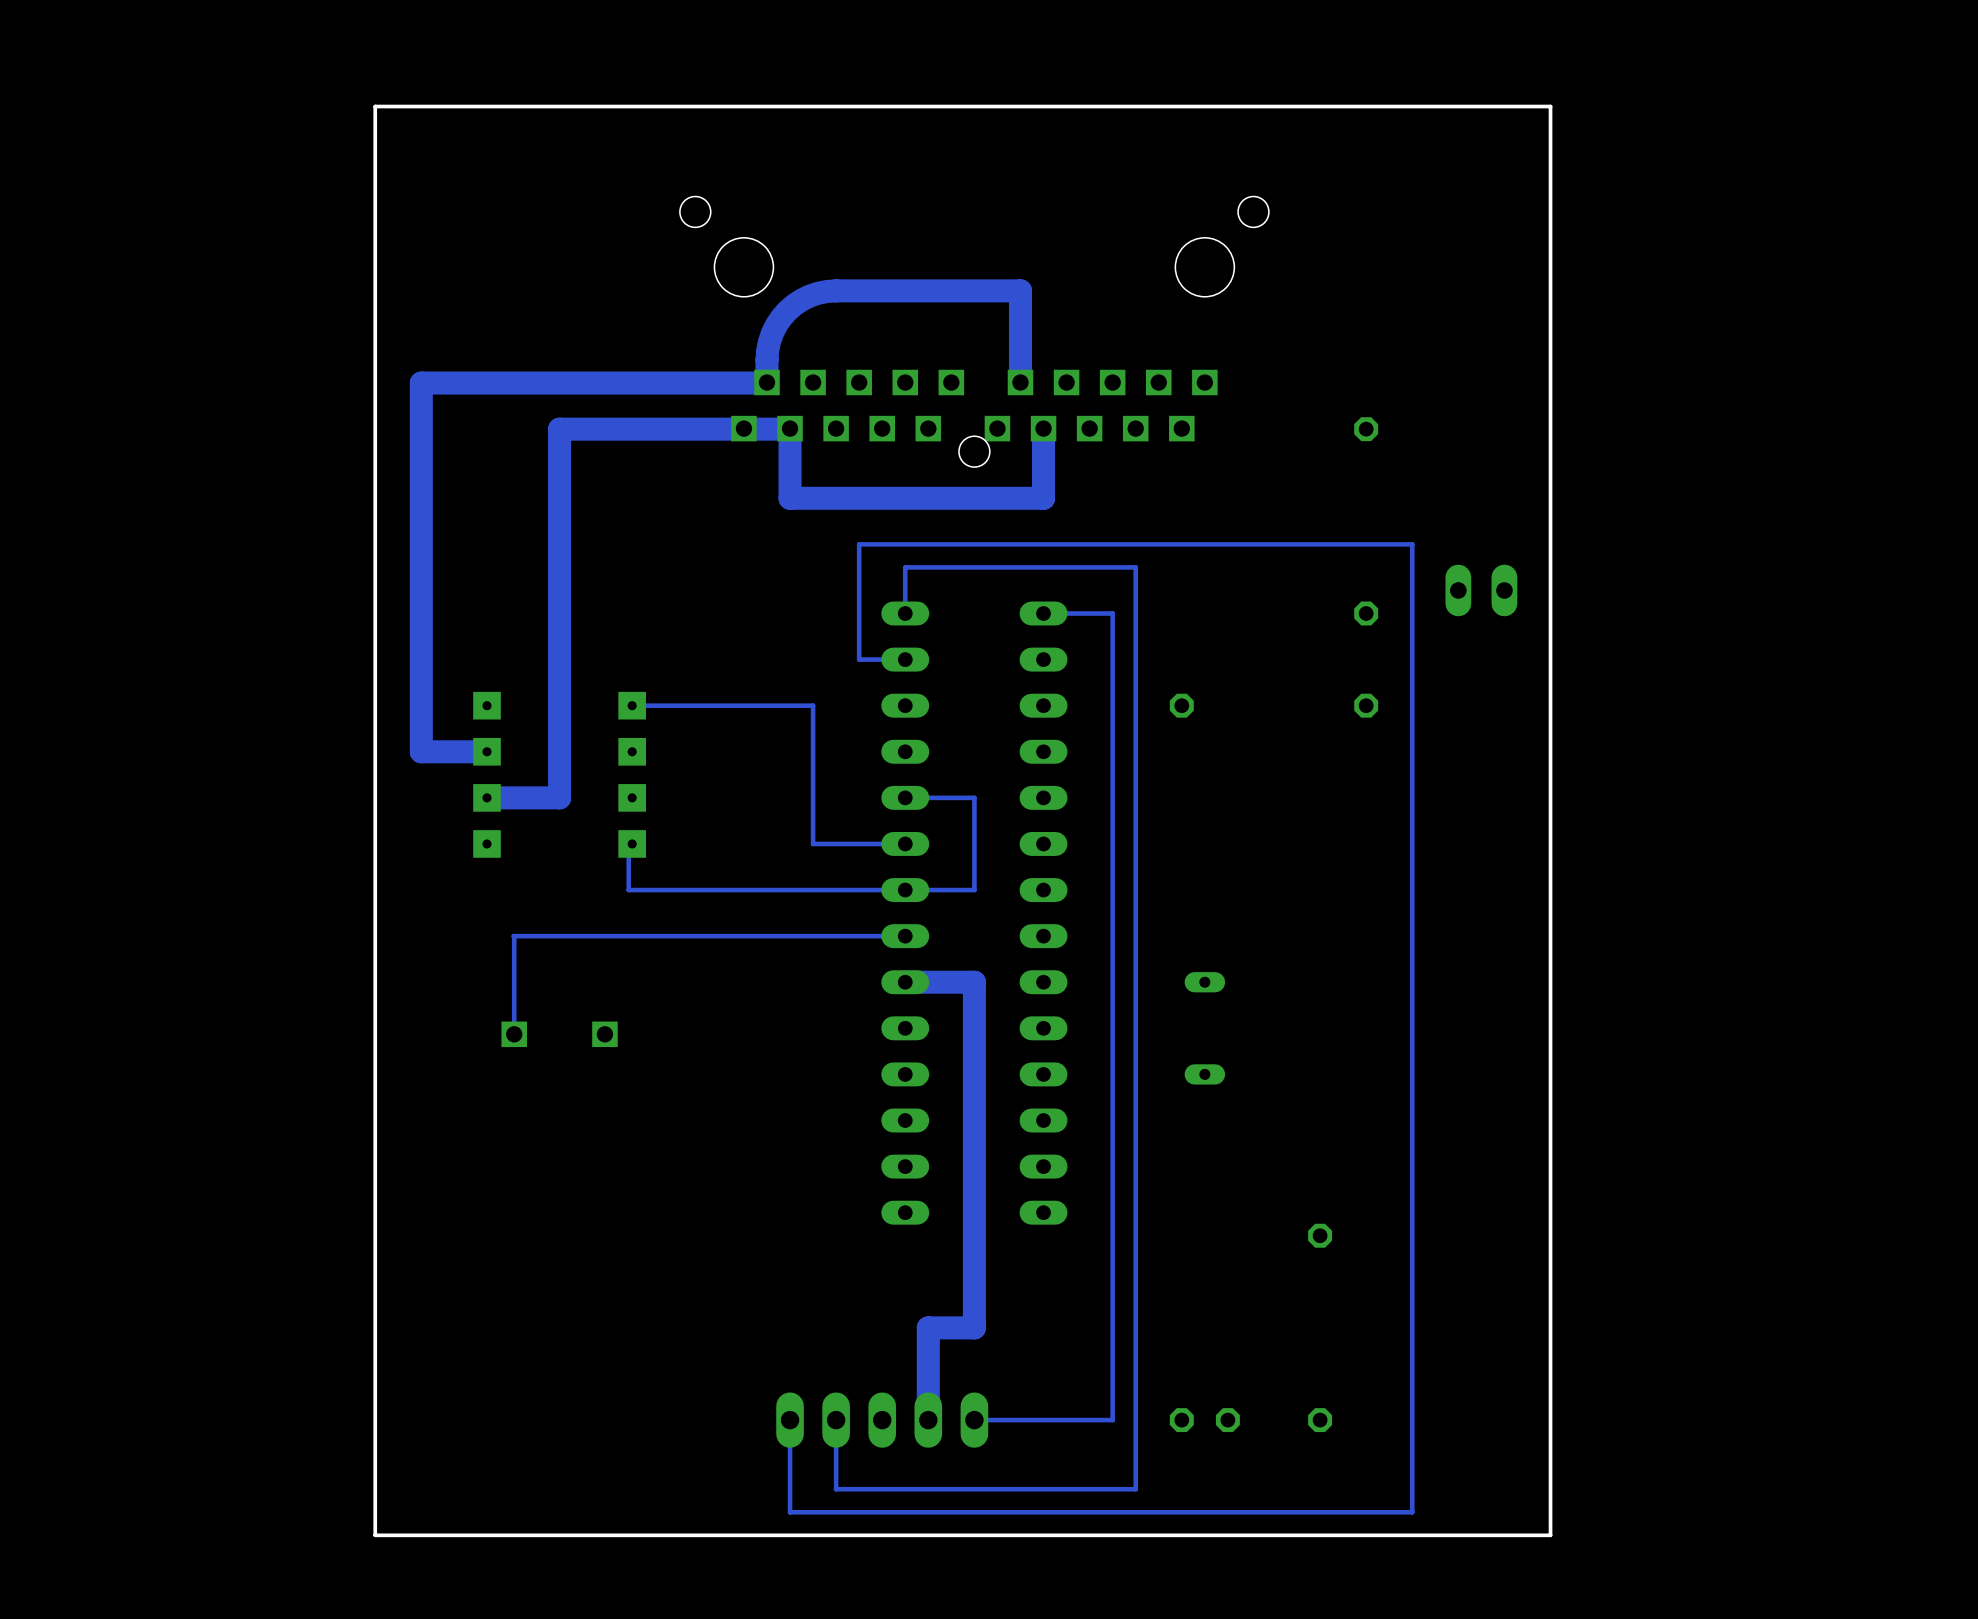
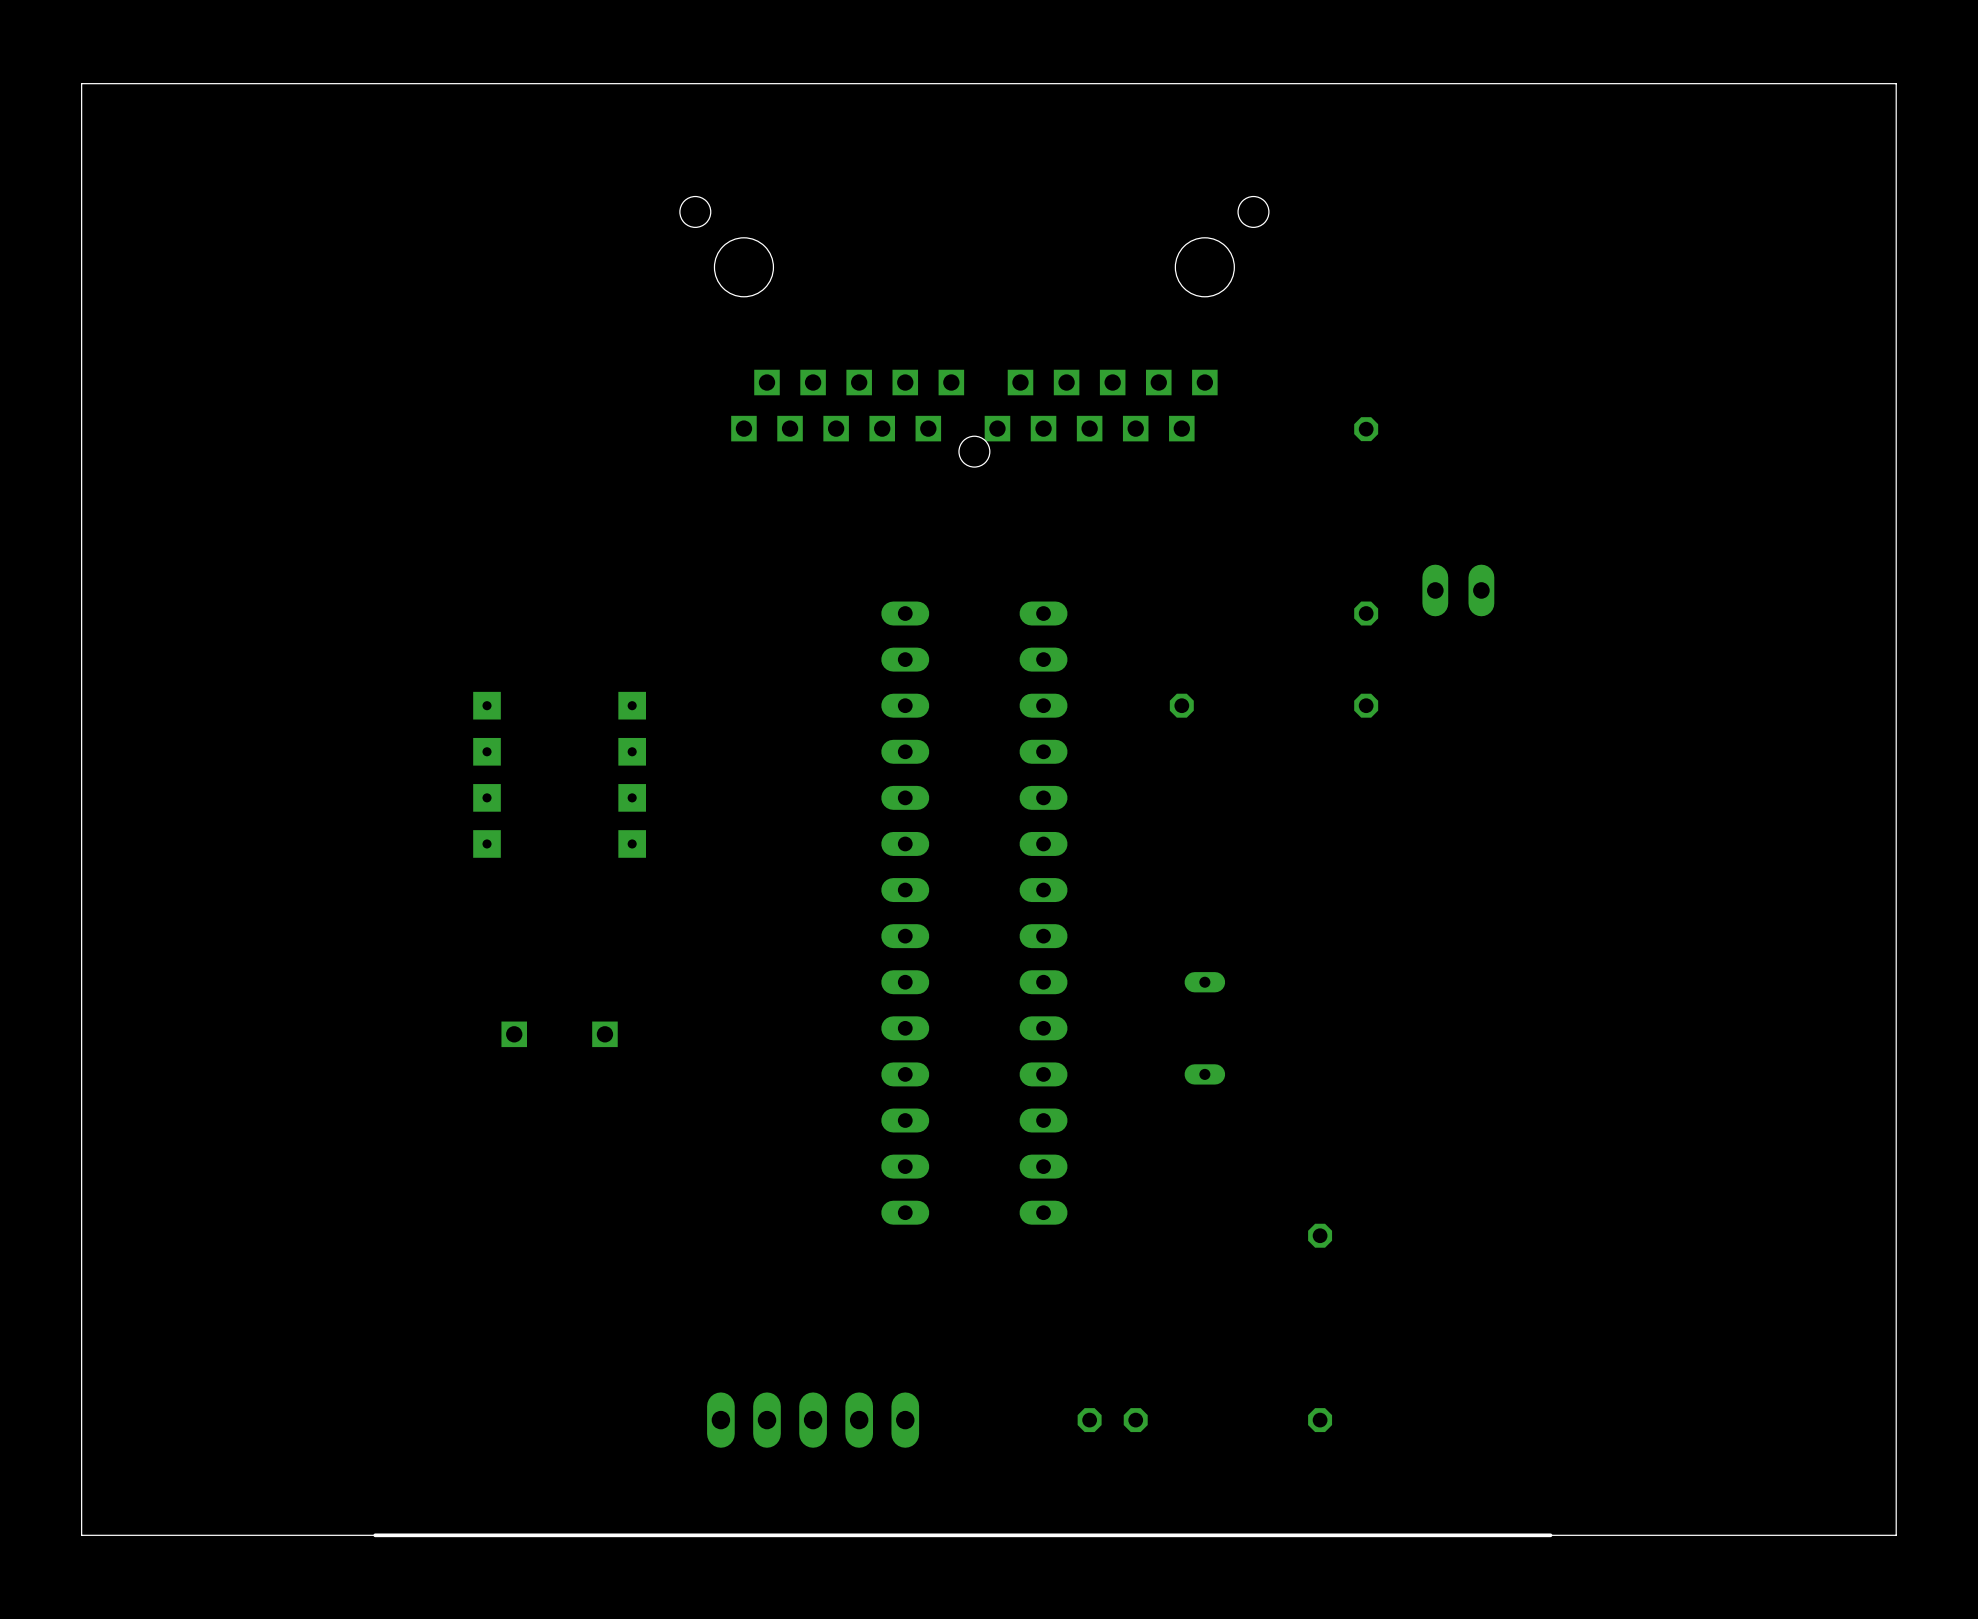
track: (1020, 382) (1020, 290) (836, 290) (809, 296) (794, 305) (781, 317) (769, 342) (766, 383) (421, 383) (421, 751) (487, 751) -> none
track: (1043, 428) (1043, 498) (790, 498) (790, 428) -> none
track: (790, 429) (559, 429) (559, 797) (487, 797) -> none
part position: (1481, 590) -> (1458, 590)
track: (905, 613) (905, 567) (1135, 567) (1135, 1489) (836, 1489) (836, 1420) -> none
track: (1043, 613) (1112, 613) (1112, 1420) (974, 1420) -> none
track: (905, 659) (859, 659) (859, 544) (1412, 544) (1412, 1512) (790, 1512) (790, 1420) -> none
track: (632, 705) (813, 705) (813, 843) (905, 843) -> none
track: (905, 797) (974, 797) (974, 890) (628, 890) (628, 843) (632, 843) -> none
track: (514, 936) (514, 1034) -> none
track: (905, 936) (513, 936) -> none
track: (905, 982) (974, 982) (974, 1327) (928, 1327) (928, 1420) -> none
part position: (882, 1420) -> (813, 1420)
part position: (1204, 1420) -> (1112, 1420)
board edge: (1550, 1535) (1550, 106) (375, 106) (375, 1535) -> (1550, 1535) (1896, 1535) (1896, 83) (81, 83) (81, 1535) (375, 1535)

